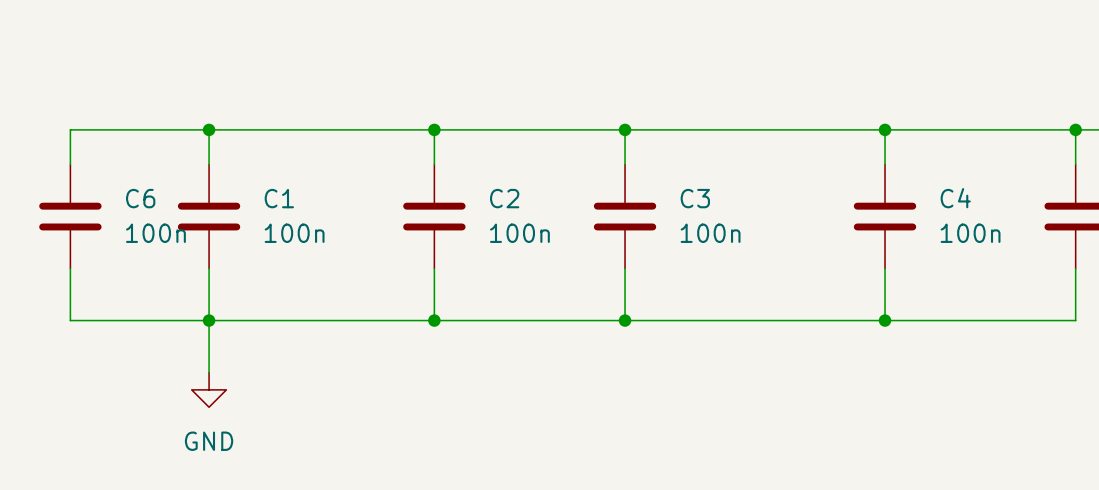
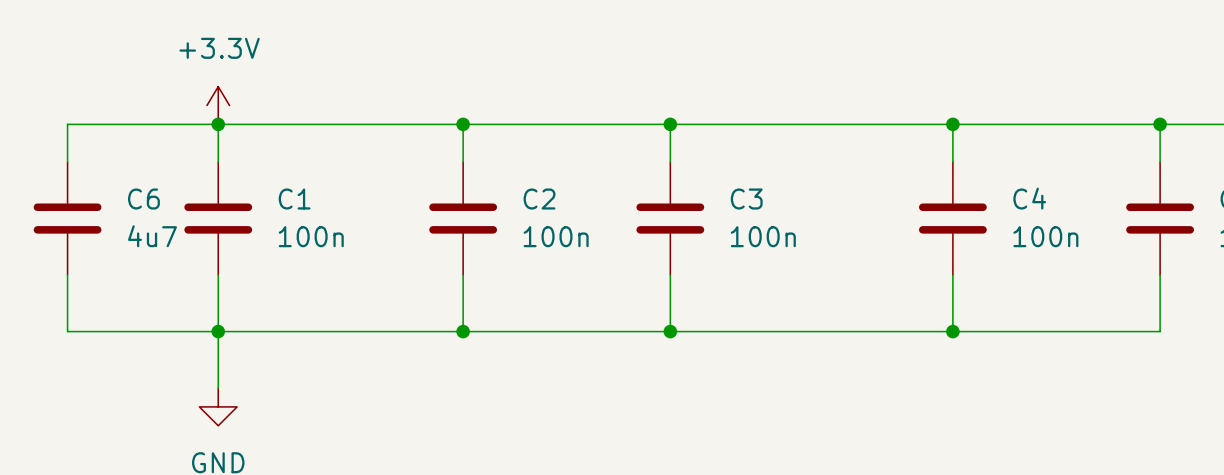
power symbol: none -> +3.3V (218, 105)
C6 value: 100n (155, 233) -> 4u7 (152, 236)

